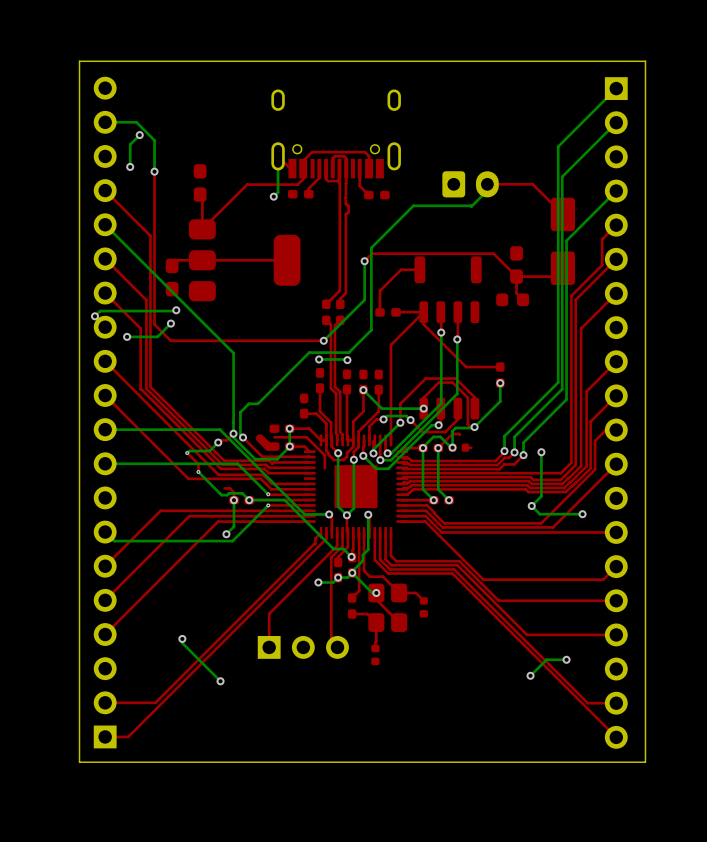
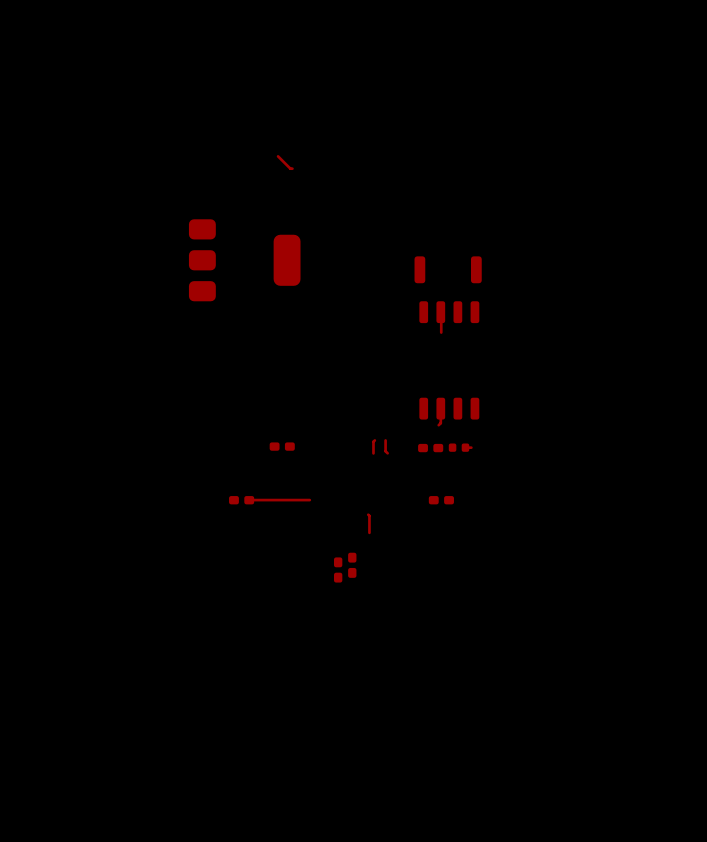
board edge: (645, 61) (79, 61) (79, 762) (645, 762) (645, 61) -> none
bottom track: (616, 88) (558, 146) (558, 382) (504, 436) (504, 451) -> none
bottom track: (105, 122) (136, 122) (154, 140) (154, 171) -> none
bottom track: (616, 122) (562, 176) (562, 389) (514, 436) (514, 452) -> none
part: (336, 133) -> none
bottom track: (139, 135) (130, 144) (130, 166) -> none
via: (139, 135) -> none
bottom track: (278, 156) (278, 192) (273, 196) -> none
via: (130, 166) -> none
top track: (319, 168) (319, 178) (308, 188) (308, 194) -> none
top track: (326, 168) (326, 179) (328, 181) (337, 181) (339, 179) -> none
top track: (332, 168) (332, 158) (334, 156) (344, 156) (346, 158) (345, 203) (348, 206) (348, 211) (345, 214) (345, 293) (340, 298) (340, 304) -> none
top track: (339, 168) (339, 290) (326, 304) -> none
top track: (359, 168) (359, 185) (368, 195) -> none
top track: (369, 168) (369, 156) (365, 152) (311, 152) (303, 160) (303, 179) (297, 184) (247, 184) (202, 229) (202, 196) (200, 194) -> none
top track: (154, 171) (154, 324) (170, 340) (323, 340) -> none
via: (154, 171) -> none
part: (200, 182) -> none
part: (470, 184) -> none
bottom track: (487, 184) (487, 190) (471, 206) (413, 205) (371, 247) (371, 330) (348, 352) (309, 352) (258, 403) (248, 403) (240, 412) (240, 434) (243, 437) -> none
top track: (486, 185) (532, 184) (562, 214) -> none
top track: (105, 190) (150, 235) (150, 386) (224, 460) (269, 460) (272, 463) (309, 462) -> none
bottom track: (616, 191) (566, 240) (566, 399) (523, 442) (523, 455) -> none
part: (300, 194) -> none
part: (376, 195) -> none
via: (273, 196) -> none
bottom track: (105, 224) (233, 353) (233, 437) (255, 459) (277, 459) (289, 446) -> none
top track: (616, 225) (602, 239) (602, 265) (571, 295) (571, 462) (560, 473) (402, 473) -> none
part: (562, 241) -> none
top track: (105, 258) (146, 300) (146, 388) (222, 464) (309, 467) -> none
top track: (616, 259) (575, 299) (575, 464) (560, 479) (533, 479) (530, 477) (402, 478) -> none
top track: (287, 260) (177, 260) (172, 265) -> none
top track: (364, 261) (372, 253) (493, 253) (516, 276) -> none
bottom track: (364, 261) (364, 299) (323, 340) -> none
via: (364, 261) -> none
part: (516, 264) -> none
top track: (562, 268) (554, 276) (516, 276) -> none
top track: (419, 269) (401, 269) (380, 290) (380, 312) -> none
top track: (516, 276) (516, 293) (523, 299) -> none
part: (172, 277) -> none
top track: (105, 293) (140, 328) (140, 389) (220, 468) (264, 468) (268, 473) (309, 473) -> none
top track: (616, 293) (581, 328) (581, 466) (569, 478) (562, 483) (531, 483) (529, 481) (410, 481) (402, 483) -> none
part: (512, 299) -> none
bottom track: (176, 310) (100, 311) (94, 316) -> none
via: (176, 310) -> none
part: (326, 312) -> none
part: (340, 312) -> none
part: (388, 312) -> none
top track: (423, 312) (423, 324) (466, 367) (500, 367) -> none
top track: (423, 312) (390, 344) (390, 440) -> none
top track: (423, 312) (396, 312) -> none
top track: (457, 312) (457, 339) -> none
via: (94, 316) -> none
top track: (326, 320) (330, 324) (330, 388) (336, 393) (337, 440) -> none
top track: (340, 320) (334, 325) (334, 386) (340, 392) (340, 432) (342, 434) (342, 440) -> none
bottom track: (170, 323) (157, 336) (127, 336) -> none
via: (170, 323) -> none
bottom track: (441, 332) (441, 403) (391, 453) (387, 453) -> none
via: (441, 332) -> none
via: (127, 336) -> none
bottom track: (457, 339) (457, 393) (390, 460) (380, 460) -> none
via: (457, 339) -> none
via: (323, 340) -> none
bottom track: (319, 359) (347, 360) -> none
via: (319, 359) -> none
via: (347, 360) -> none
top track: (105, 361) (218, 474) (262, 474) (272, 483) (309, 483) -> none
top track: (616, 361) (586, 391) (586, 466) (564, 487) (530, 487) (527, 485) (411, 485) (402, 489) -> none
part: (500, 375) -> none
part: (320, 380) -> none
part: (347, 381) -> none
part: (363, 382) -> none
part: (378, 382) -> none
bottom track: (500, 383) (500, 401) (473, 428) (455, 428) (452, 431) -> none
via: (500, 383) -> none
top track: (320, 388) (320, 411) (331, 422) (331, 446) (338, 453) -> none
top track: (347, 389) (347, 439) (353, 440) -> none
top track: (363, 389) (363, 411) (353, 421) (353, 446) (343, 460) (333, 460) (326, 451) (326, 423) (316, 413) (304, 413) -> none
top track: (378, 389) (378, 411) (358, 431) (358, 447) (353, 451) (353, 459) -> none
bottom track: (363, 390) (381, 408) (423, 408) -> none
via: (363, 390) -> none
top track: (105, 395) (188, 478) (260, 478) (271, 489) (309, 489) -> none
top track: (616, 395) (590, 421) (590, 468) (565, 492) (528, 492) (525, 489) (413, 489) (407, 494) (402, 494) -> none
part: (304, 406) -> none
top track: (423, 408) (423, 397) (438, 382) (452, 382) (467, 397) (467, 424) (474, 427) -> none
via: (423, 408) -> none
top track: (457, 408) (457, 419) (445, 432) (422, 432) (410, 420) -> none
top track: (474, 408) (474, 397) (455, 378) (425, 378) (400, 403) (400, 422) -> none
part: (105, 412) -> none
part: (616, 412) -> none
top track: (383, 419) (376, 419) (369, 426) (369, 440) -> none
bottom track: (383, 419) (386, 416) (406, 416) (410, 420) -> none
via: (383, 419) -> none
via: (410, 420) -> none
bottom track: (400, 422) (373, 449) (373, 453) -> none
via: (400, 422) -> none
bottom track: (438, 425) (431, 425) (388, 468) (376, 468) (363, 455) -> none
via: (438, 425) -> none
via: (474, 427) -> none
part: (282, 428) -> none
top track: (289, 428) (309, 428) (321, 440) (326, 440) -> none
bottom track: (289, 428) (289, 446) -> none
via: (289, 428) -> none
bottom track: (105, 429) (219, 429) (304, 514) (329, 514) -> none
top track: (616, 430) (605, 430) (595, 440) (595, 469) (541, 523) (444, 523) (427, 505) (402, 505) -> none
bottom track: (452, 431) (452, 447) (440, 436) (433, 436) (423, 447) (423, 489) (433, 500) -> none
top track: (233, 433) (226, 440) (220, 440) (218, 442) -> none
via: (233, 433) -> none
top track: (459, 434) (452, 433) (438, 448) -> none
top track: (243, 437) (262, 456) (309, 457) -> none
via: (243, 437) -> none
top track: (274, 437) (306, 437) (324, 455) (324, 468) -> none
top track: (259, 438) (268, 446) (274, 446) -> none
top track: (364, 440) (363, 455) -> none
top track: (380, 440) (380, 459) -> none
bottom track: (218, 442) (209, 451) (189, 451) (187, 453) -> none
via: (218, 442) -> none
top track: (289, 446) (304, 446) (309, 451) -> none
via: (289, 446) -> none
via: (452, 447) -> none
top track: (423, 448) (405, 448) (402, 451) -> none
via: (423, 448) -> none
bottom track: (438, 448) (438, 489) (449, 500) -> none
via: (438, 448) -> none
top track: (504, 451) (495, 461) (411, 461) (402, 457) -> none
via: (504, 451) -> none
top track: (514, 452) (509, 457) (504, 457) (497, 465) (410, 465) (402, 462) -> none
via: (514, 452) -> none
bottom track: (541, 452) (541, 496) (531, 505) (539, 514) (582, 514) -> none
via: (541, 452) -> none
top track: (187, 453) (198, 464) (198, 471) -> none
via: (187, 453) -> none
bottom track: (338, 453) (338, 506) (346, 515) (353, 508) (353, 459) -> none
via: (338, 453) -> none
via: (373, 453) -> none
via: (387, 453) -> none
via: (363, 455) -> none
top track: (523, 455) (514, 464) (504, 464) (499, 469) (402, 467) -> none
via: (523, 455) -> none
via: (353, 459) -> none
via: (380, 460) -> none
bottom track: (105, 463) (237, 463) (268, 494) -> none
top track: (616, 464) (553, 527) (442, 527) (426, 510) (402, 510) -> none
bottom track: (198, 471) (219, 493) -> none
via: (198, 471) -> none
part: (356, 486) -> none
top track: (224, 488) (229, 488) (233, 492) (233, 500) -> none
bottom track: (220, 493) (221, 495) (242, 493) (249, 500) -> none
top track: (268, 494) (309, 494) -> none
via: (268, 494) -> none
bottom track: (233, 500) (233, 526) (226, 534) -> none
via: (233, 500) -> none
bottom track: (249, 500) (284, 500) (333, 549) (343, 549) (351, 556) -> none
via: (249, 500) -> none
top track: (433, 500) (402, 500) -> none
via: (433, 500) -> none
via: (449, 500) -> none
bottom track: (268, 505) (232, 541) (114, 541) (105, 532) -> none
via: (268, 505) -> none
top track: (309, 505) (268, 505) -> none
via: (531, 505) -> none
top track: (309, 510) (160, 510) (105, 566) -> none
top track: (329, 514) (331, 517) (331, 532) -> none
via: (329, 514) -> none
bottom track: (368, 514) (368, 549) (362, 555) (362, 560) (352, 572) -> none
via: (368, 514) -> none
via: (582, 514) -> none
top track: (346, 515) (347, 547) (338, 556) (338, 562) -> none
via: (346, 515) -> none
top track: (309, 516) (189, 516) (105, 600) -> none
top track: (402, 516) (425, 516) (441, 532) (616, 532) -> none
top track: (309, 521) (218, 521) (105, 634) -> none
top track: (402, 521) (425, 521) (483, 579) (603, 579) (616, 566) -> none
top track: (321, 532) (315, 538) (315, 543) (155, 702) (105, 702) -> none
top track: (326, 532) (326, 538) (128, 736) (105, 736) -> none
top track: (337, 532) (337, 545) (269, 613) (269, 647) -> none
top track: (342, 532) (342, 546) (331, 557) (331, 641) (337, 647) -> none
top track: (353, 532) (352, 557) -> none
top track: (358, 532) (359, 590) (352, 597) -> none
top track: (364, 532) (364, 570) (369, 576) (382, 576) (399, 592) (415, 592) (423, 600) -> none
top track: (374, 532) (374, 560) (388, 573) (452, 573) (616, 737) -> none
top track: (380, 532) (380, 559) (389, 569) (454, 569) (587, 703) (616, 703) -> none
top track: (385, 532) (385, 559) (391, 565) (457, 565) (527, 634) (616, 634) -> none
top track: (390, 532) (390, 555) (396, 561) (459, 561) (498, 600) (616, 600) -> none
via: (226, 534) -> none
via: (351, 556) -> none
bottom track: (352, 572) (347, 577) (338, 577) (333, 582) (318, 582) -> none
bottom track: (352, 572) (372, 592) (376, 592) -> none
via: (352, 572) -> none
via: (338, 577) -> none
via: (318, 582) -> none
top track: (376, 592) (376, 599) (399, 622) -> none
via: (376, 592) -> none
part: (352, 606) -> none
part: (387, 607) -> none
part: (423, 607) -> none
top track: (352, 614) (367, 614) (376, 622) (375, 648) -> none
bottom track: (182, 638) (182, 643) (220, 681) -> none
via: (182, 638) -> none
part: (303, 647) -> none
part: (375, 654) -> none
bottom track: (566, 659) (546, 659) (530, 675) -> none
via: (566, 659) -> none
via: (530, 675) -> none
via: (220, 681) -> none

